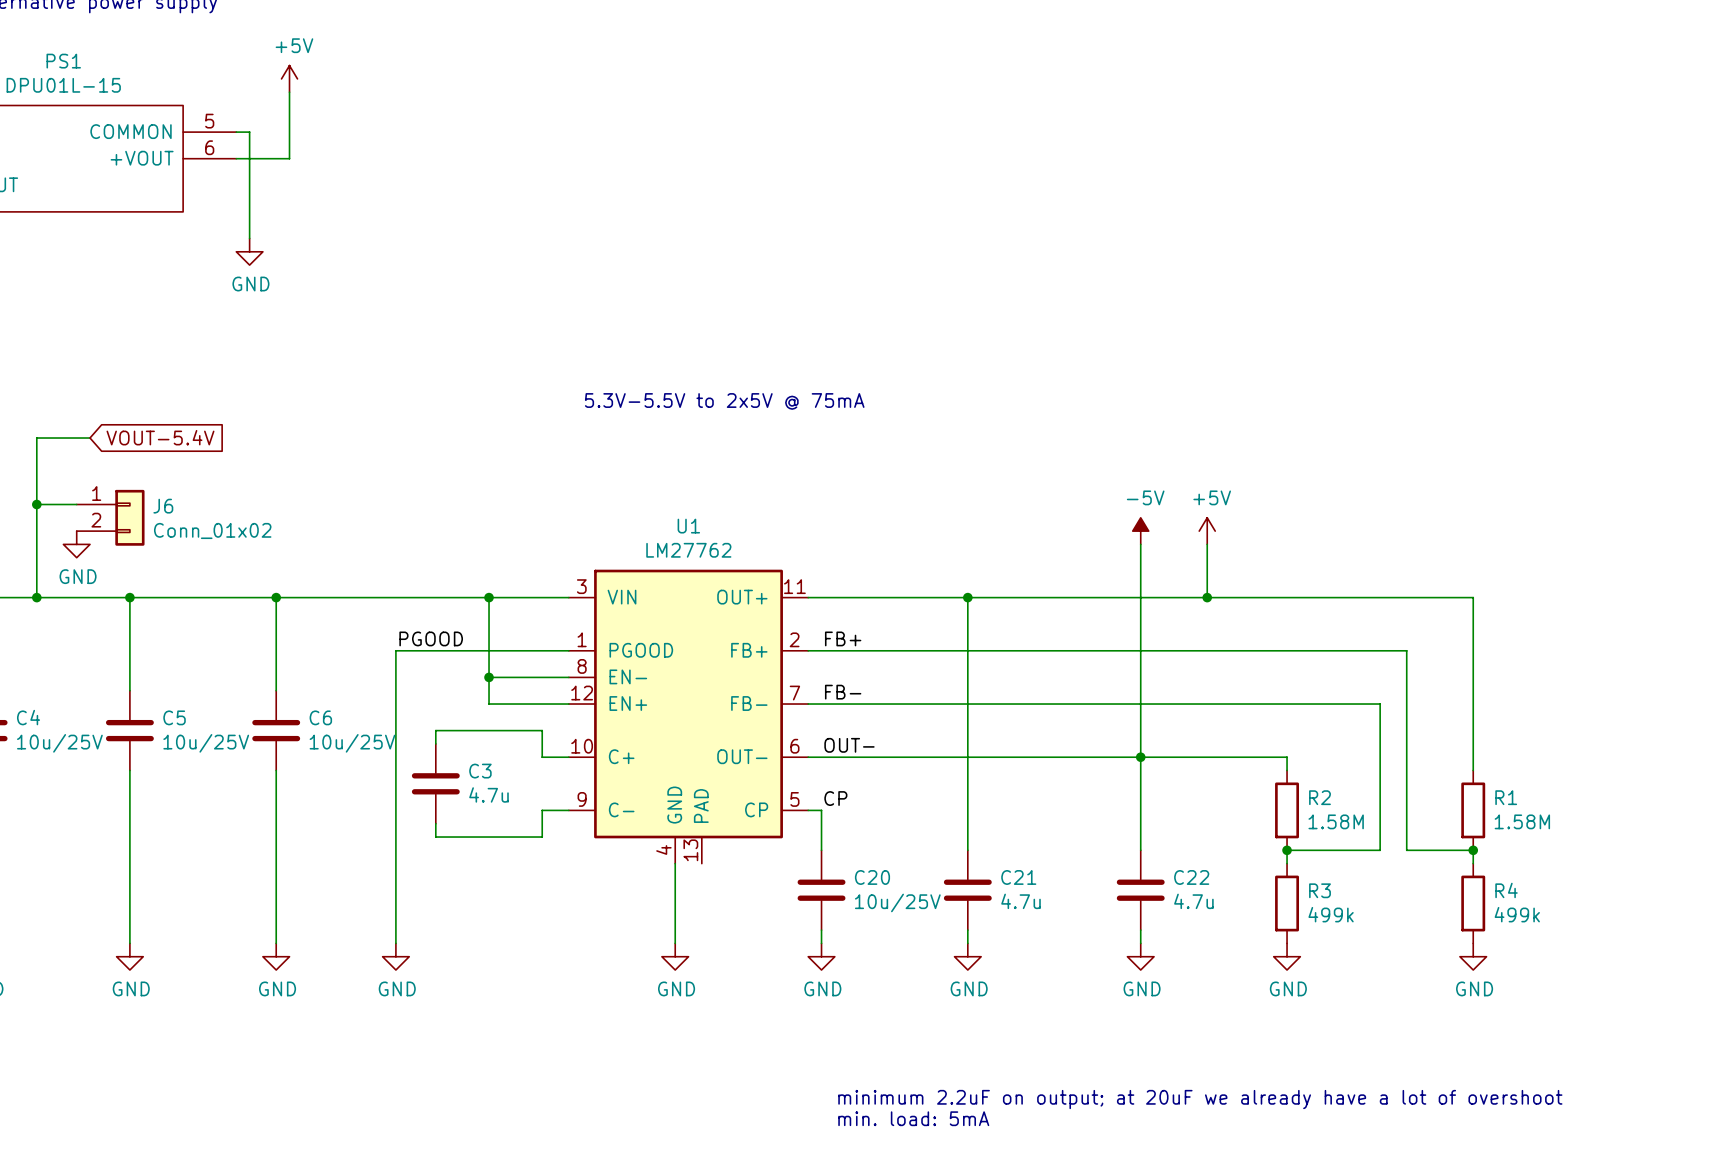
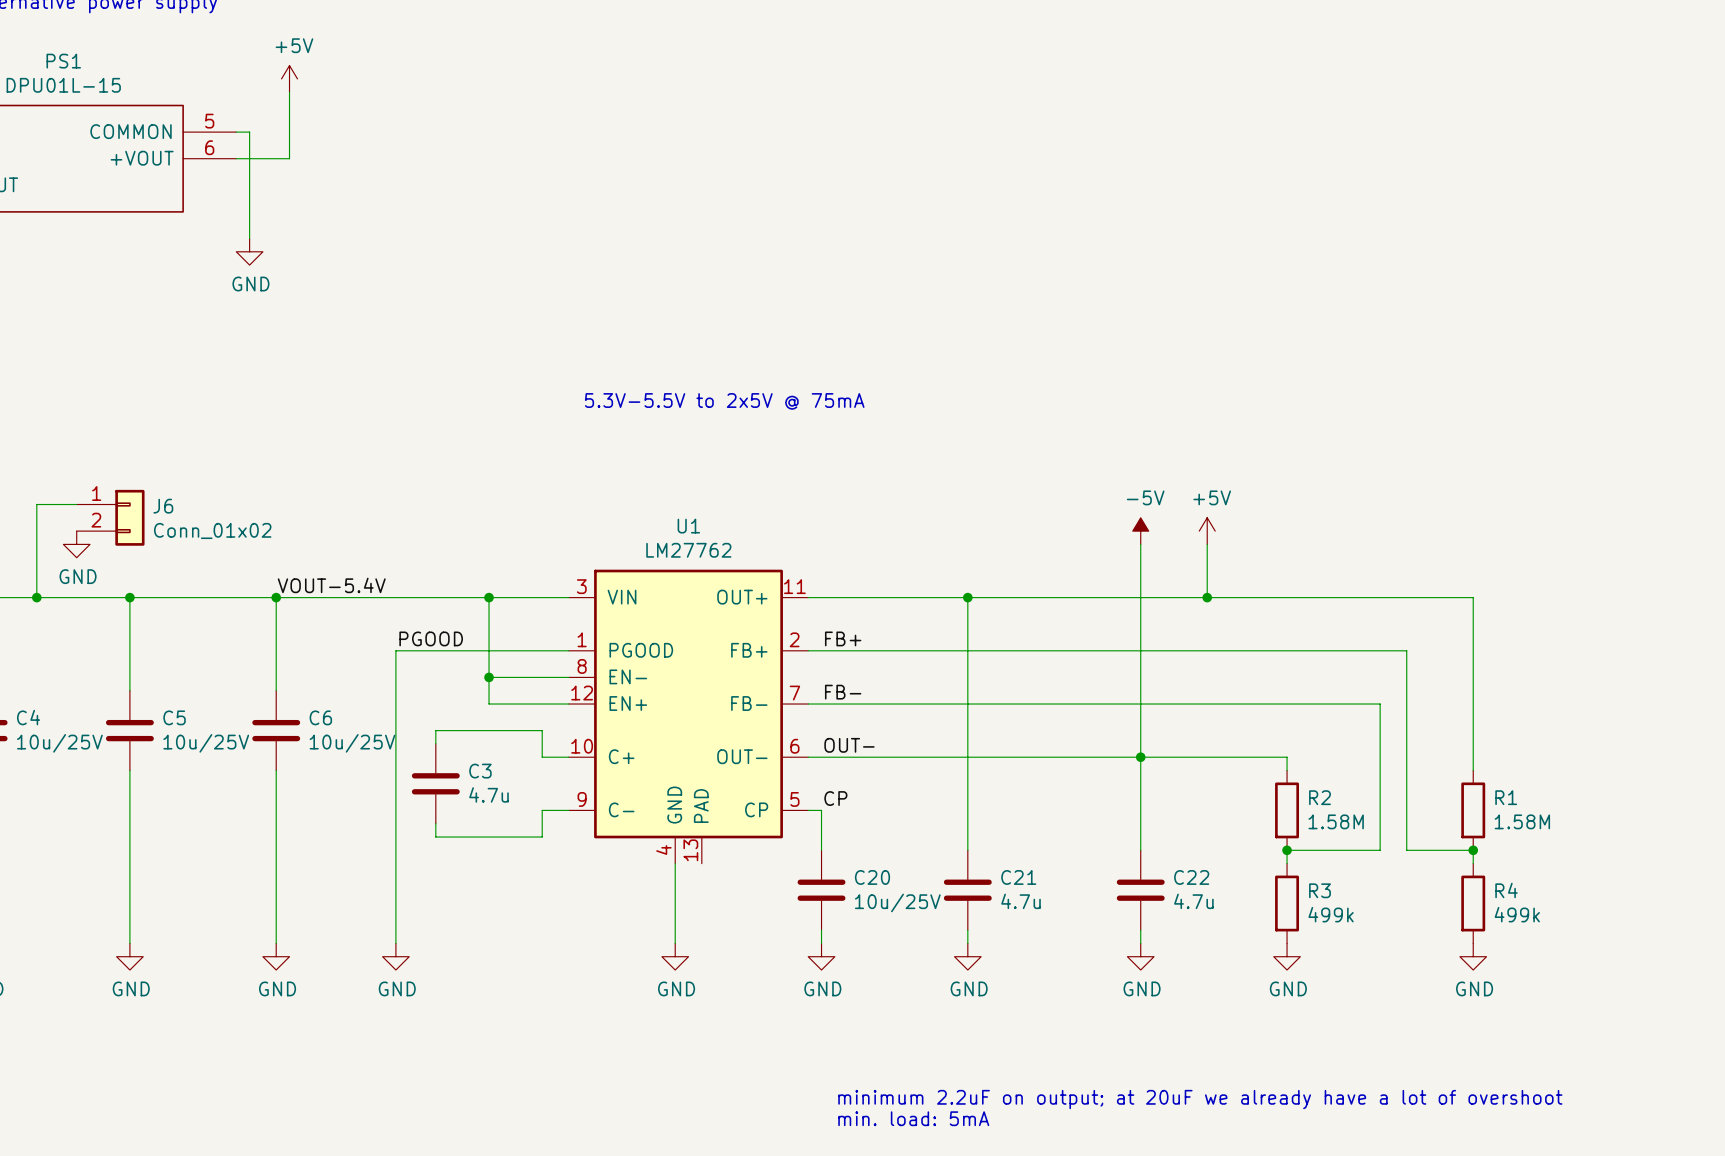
global label: VOUT-5.4V (160, 437) -> none
wire: (90, 438) (36, 438) (36, 504) -> none
junction: (36, 504) -> none
label: none -> VOUT-5.4V (331, 585)

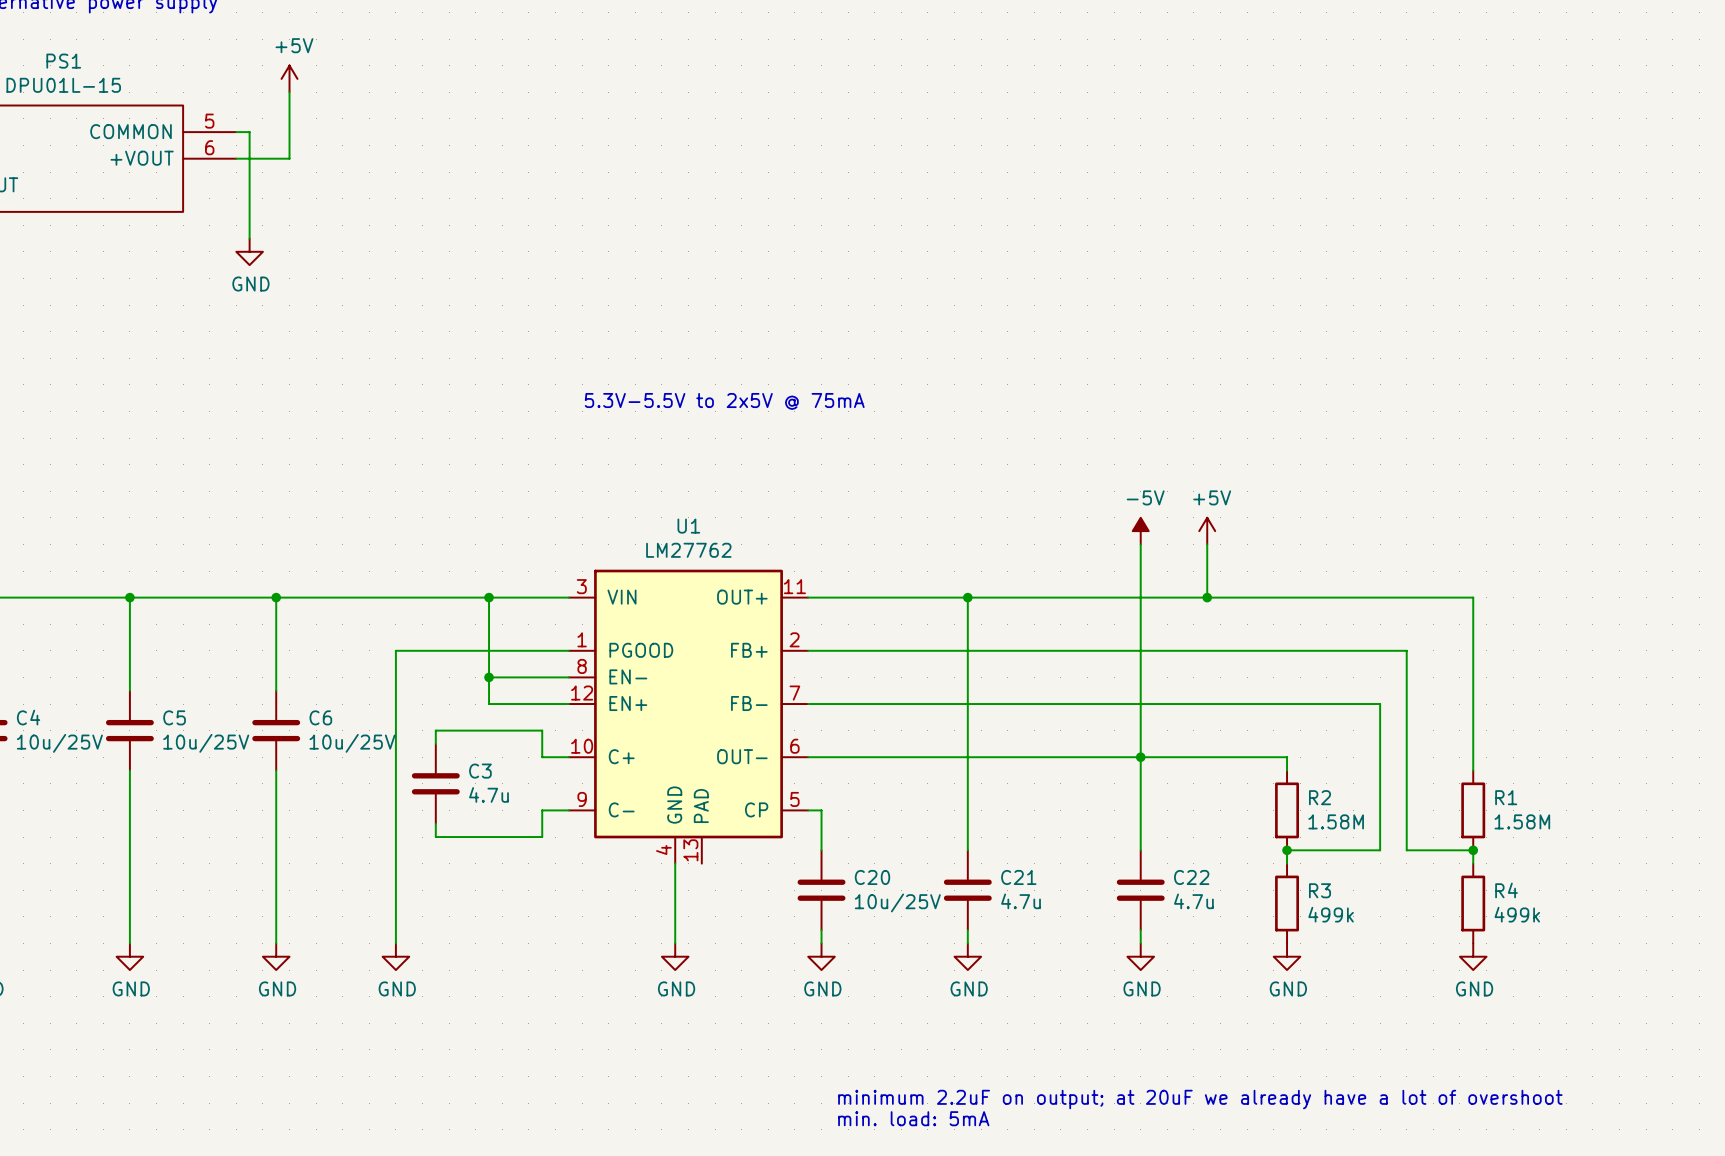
wire: (76, 504) (36, 504) (36, 597) -> none
J6: Conn_01x02 (110, 517) -> none
power symbol: GND (76, 544) -> none
label: VOUT-5.4V (331, 585) -> none
junction: (36, 597) -> none
label: PGOOD (431, 638) -> none
label: FB+ (843, 638) -> none
label: FB- (843, 692) -> none
label: OUT- (849, 745) -> none
label: CP (835, 798) -> none

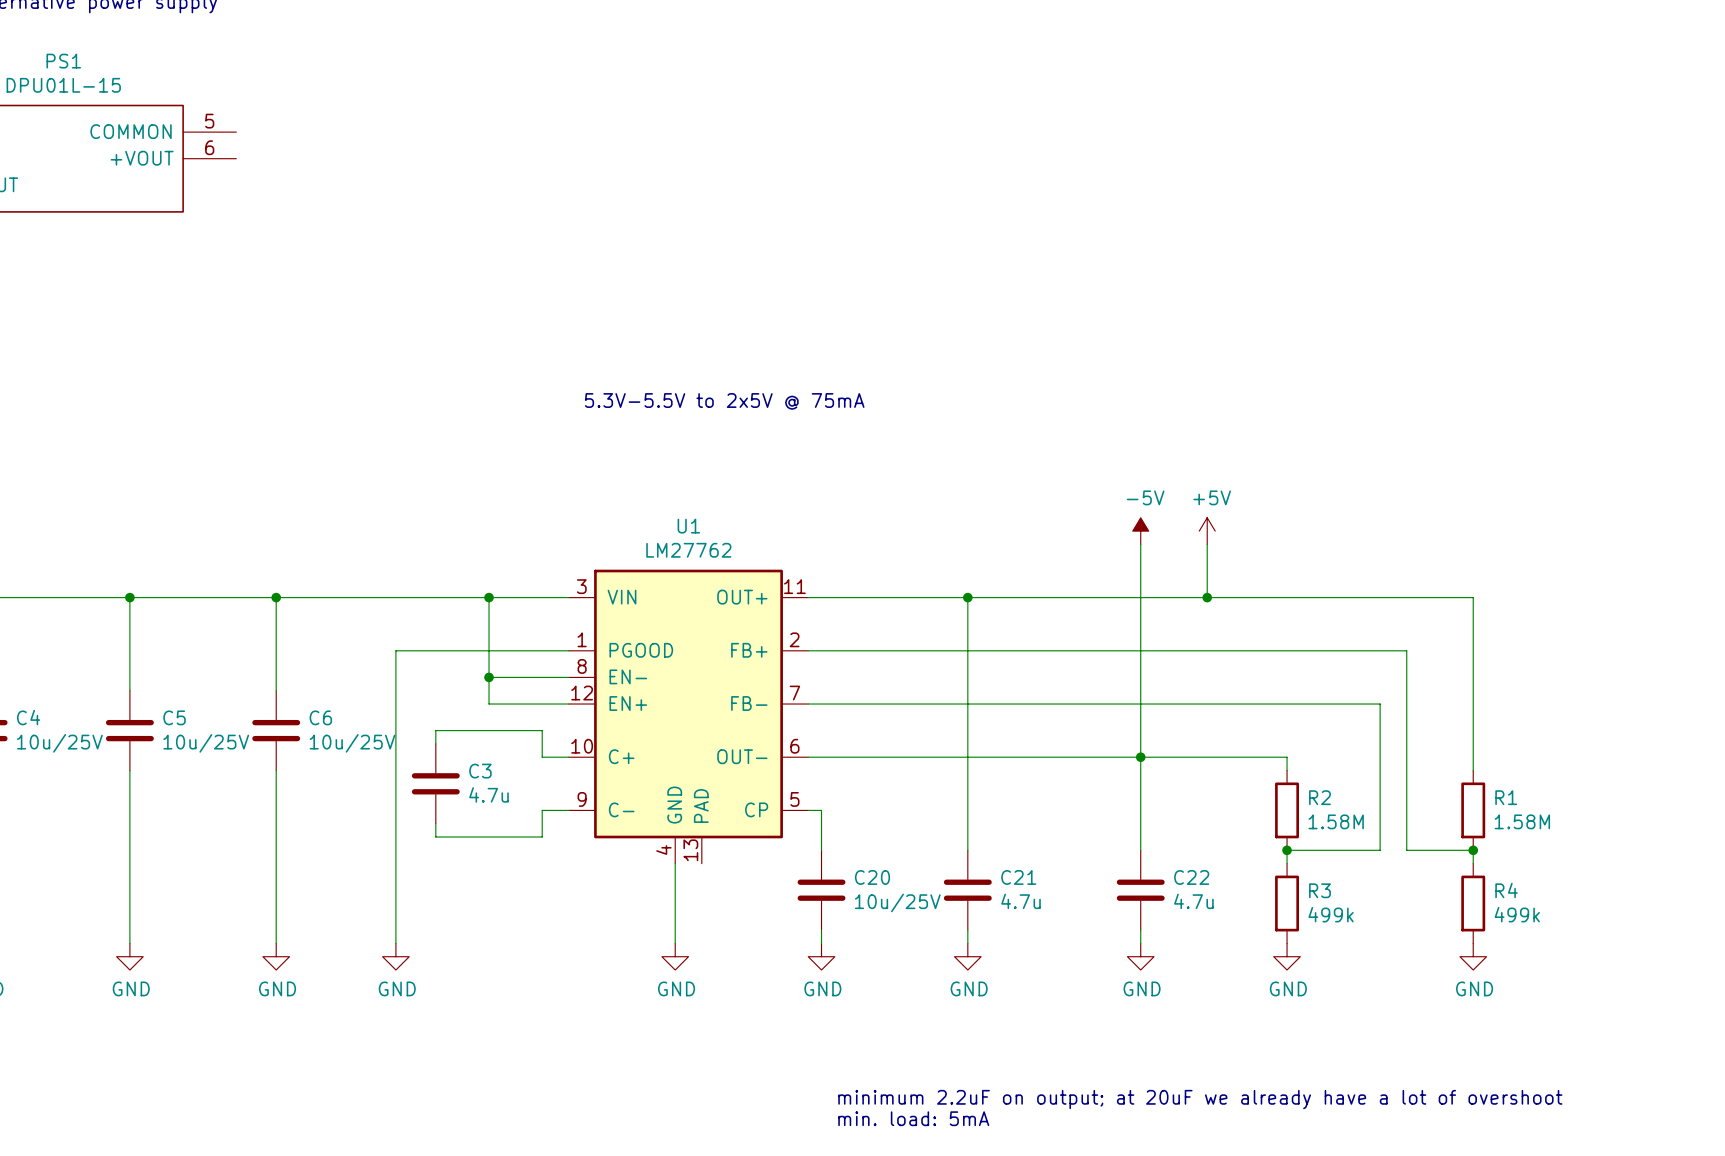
power symbol: +5V (289, 78) -> none
wire: (289, 92) (289, 158) (236, 158) -> none
wire: (236, 132) (249, 132) (249, 238) -> none
power symbol: GND (249, 251) -> none

